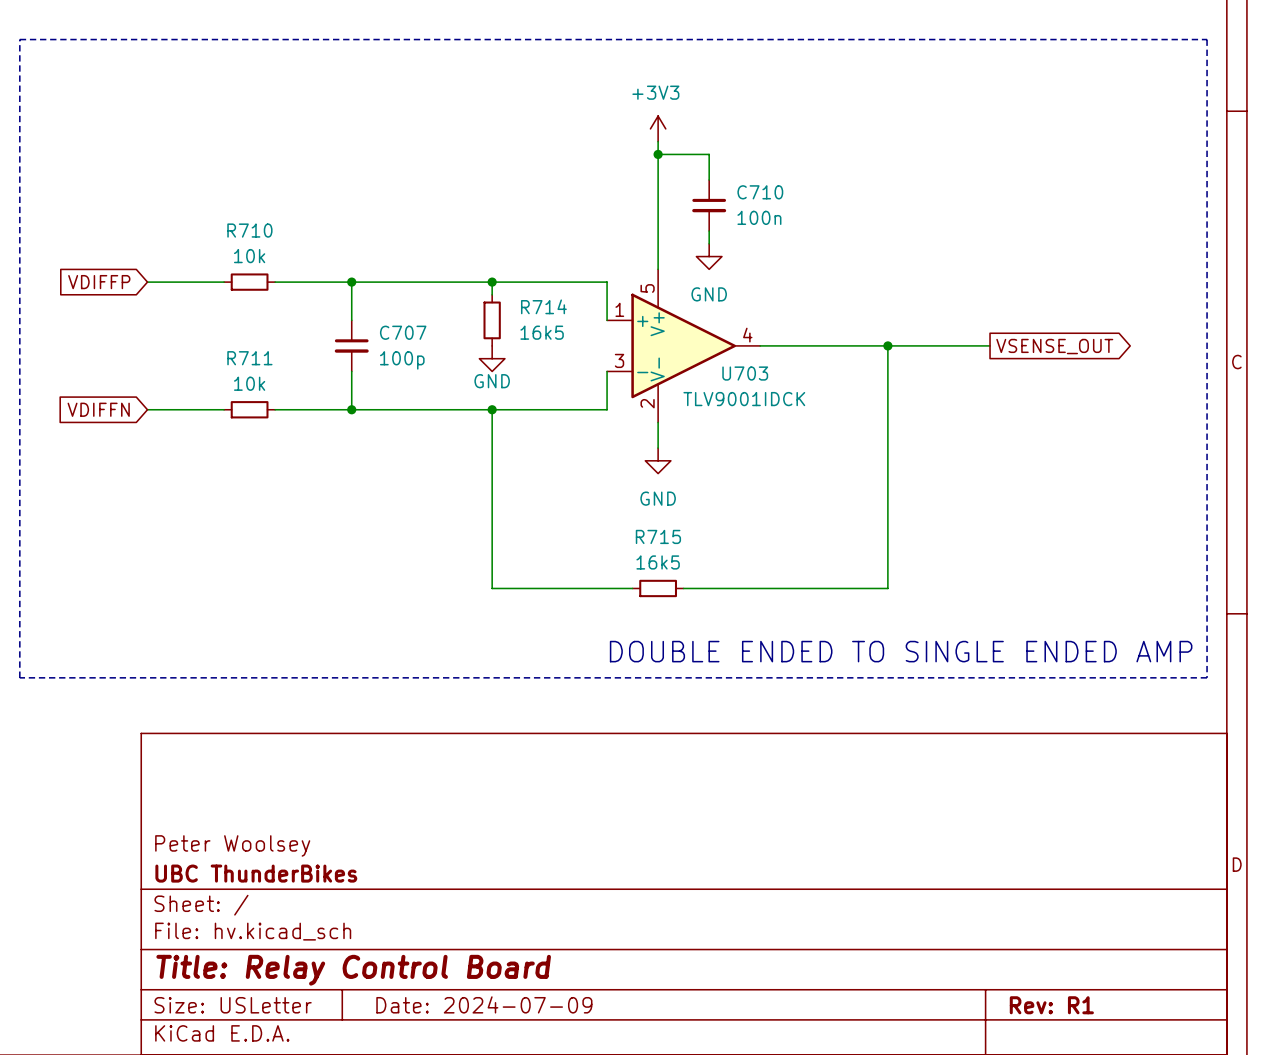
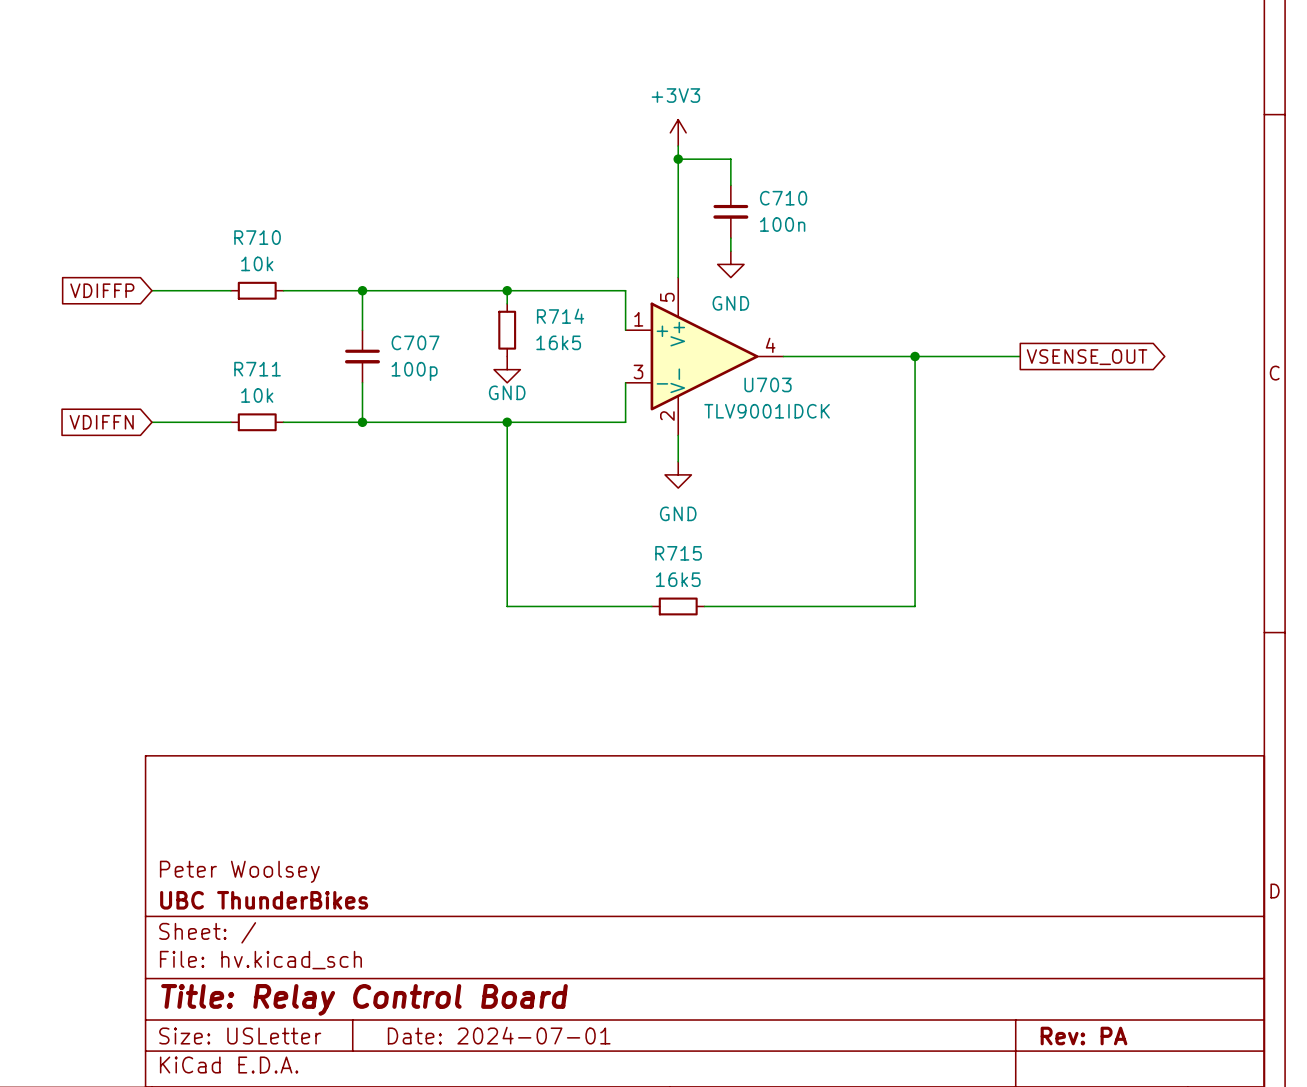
line: (19, 39) (1207, 39) (1207, 677) (19, 677) (19, 39) -> none
text: DOUBLE ENDED TO SINGLE ENDED AMP (901, 651) -> none
title block: Date: 2024-07-09 (484, 1004) -> Date: 2024-07-01 (499, 1035)
title block: Rev: R1 (1051, 1005) -> Rev: PA (1084, 1036)

